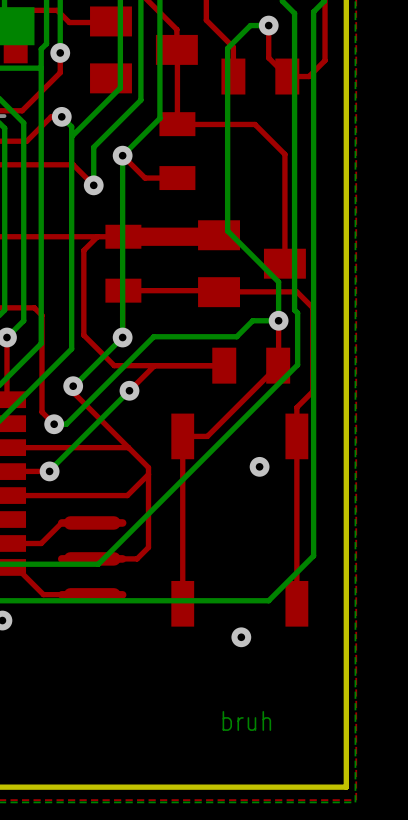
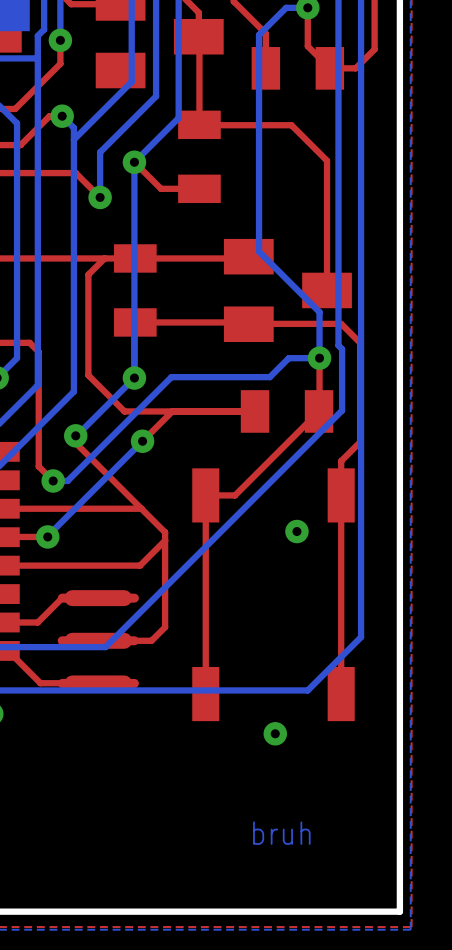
top track width: thick (217, 236) (123, 236) -> thin (247, 258) (135, 258)

